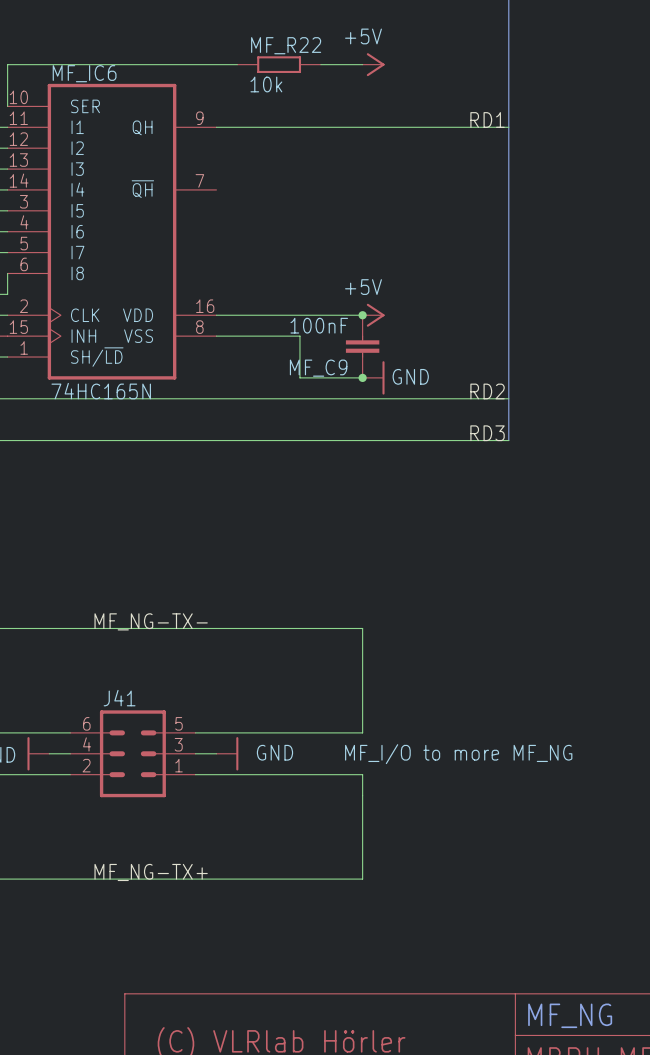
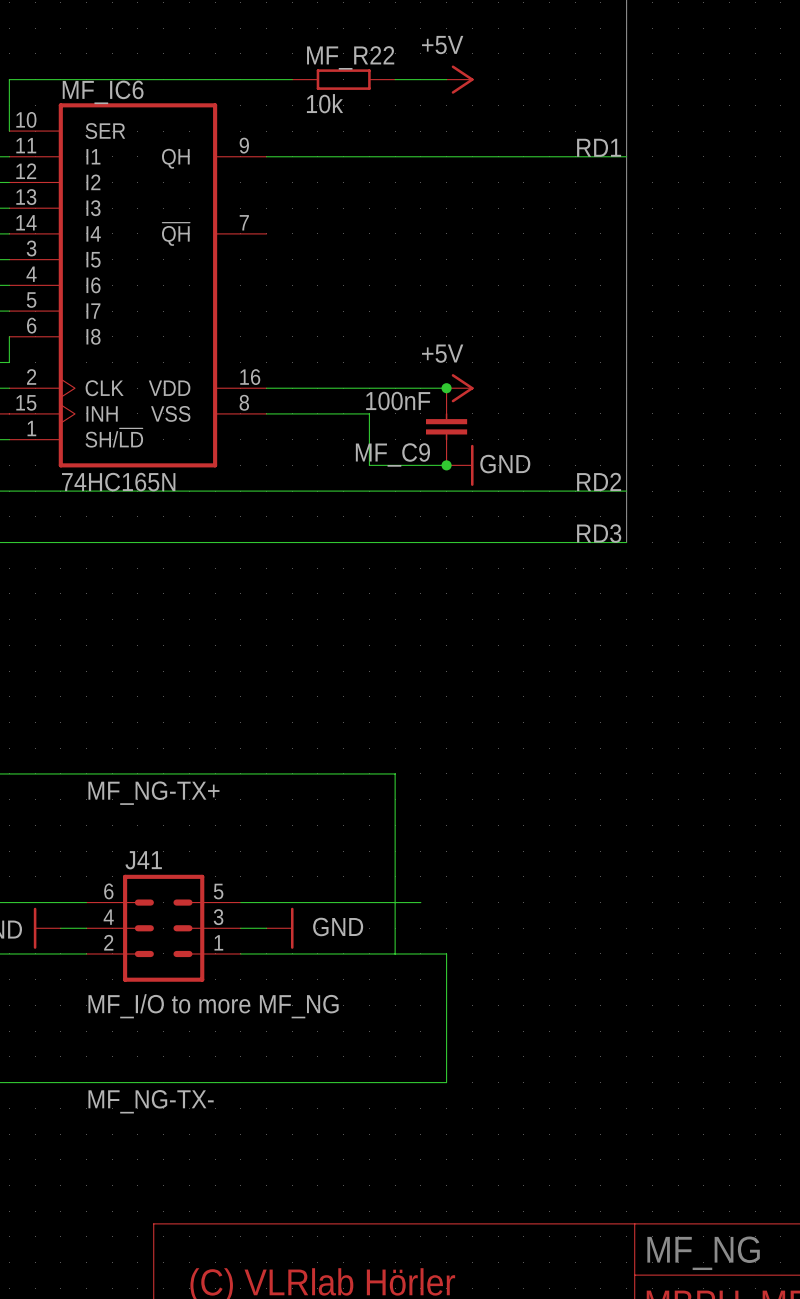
label: MF_NG-TX- (151, 621) -> MF_NG-TX+ (153, 793)
wire: (320, 628) (362, 628) (362, 732) (341, 732) -> (395, 773) (395, 953)
J41 value position: MF_I/O to more MF_NG (458, 754) -> MF_I/O to more MF_NG (213, 1006)
label: MF_NG-TX+ (151, 872) -> MF_NG-TX- (151, 1101)

